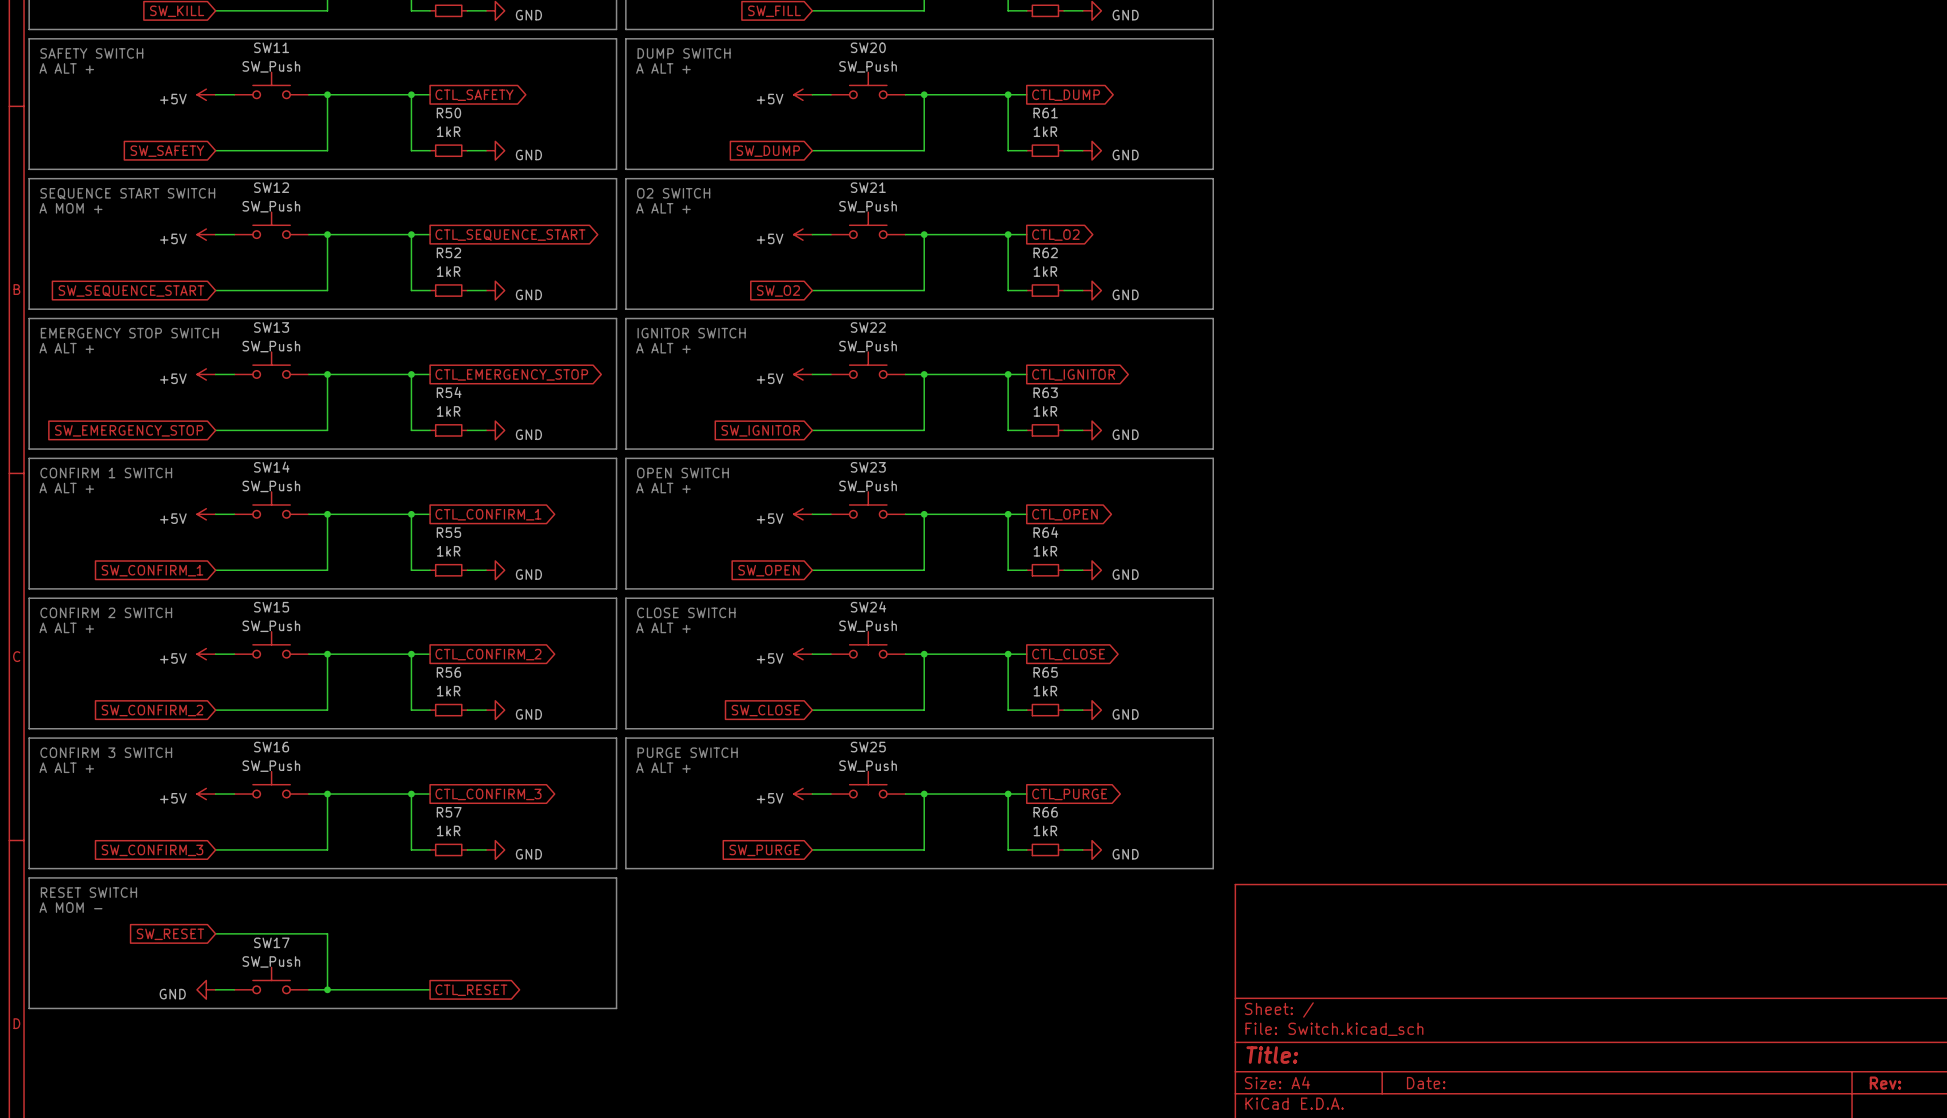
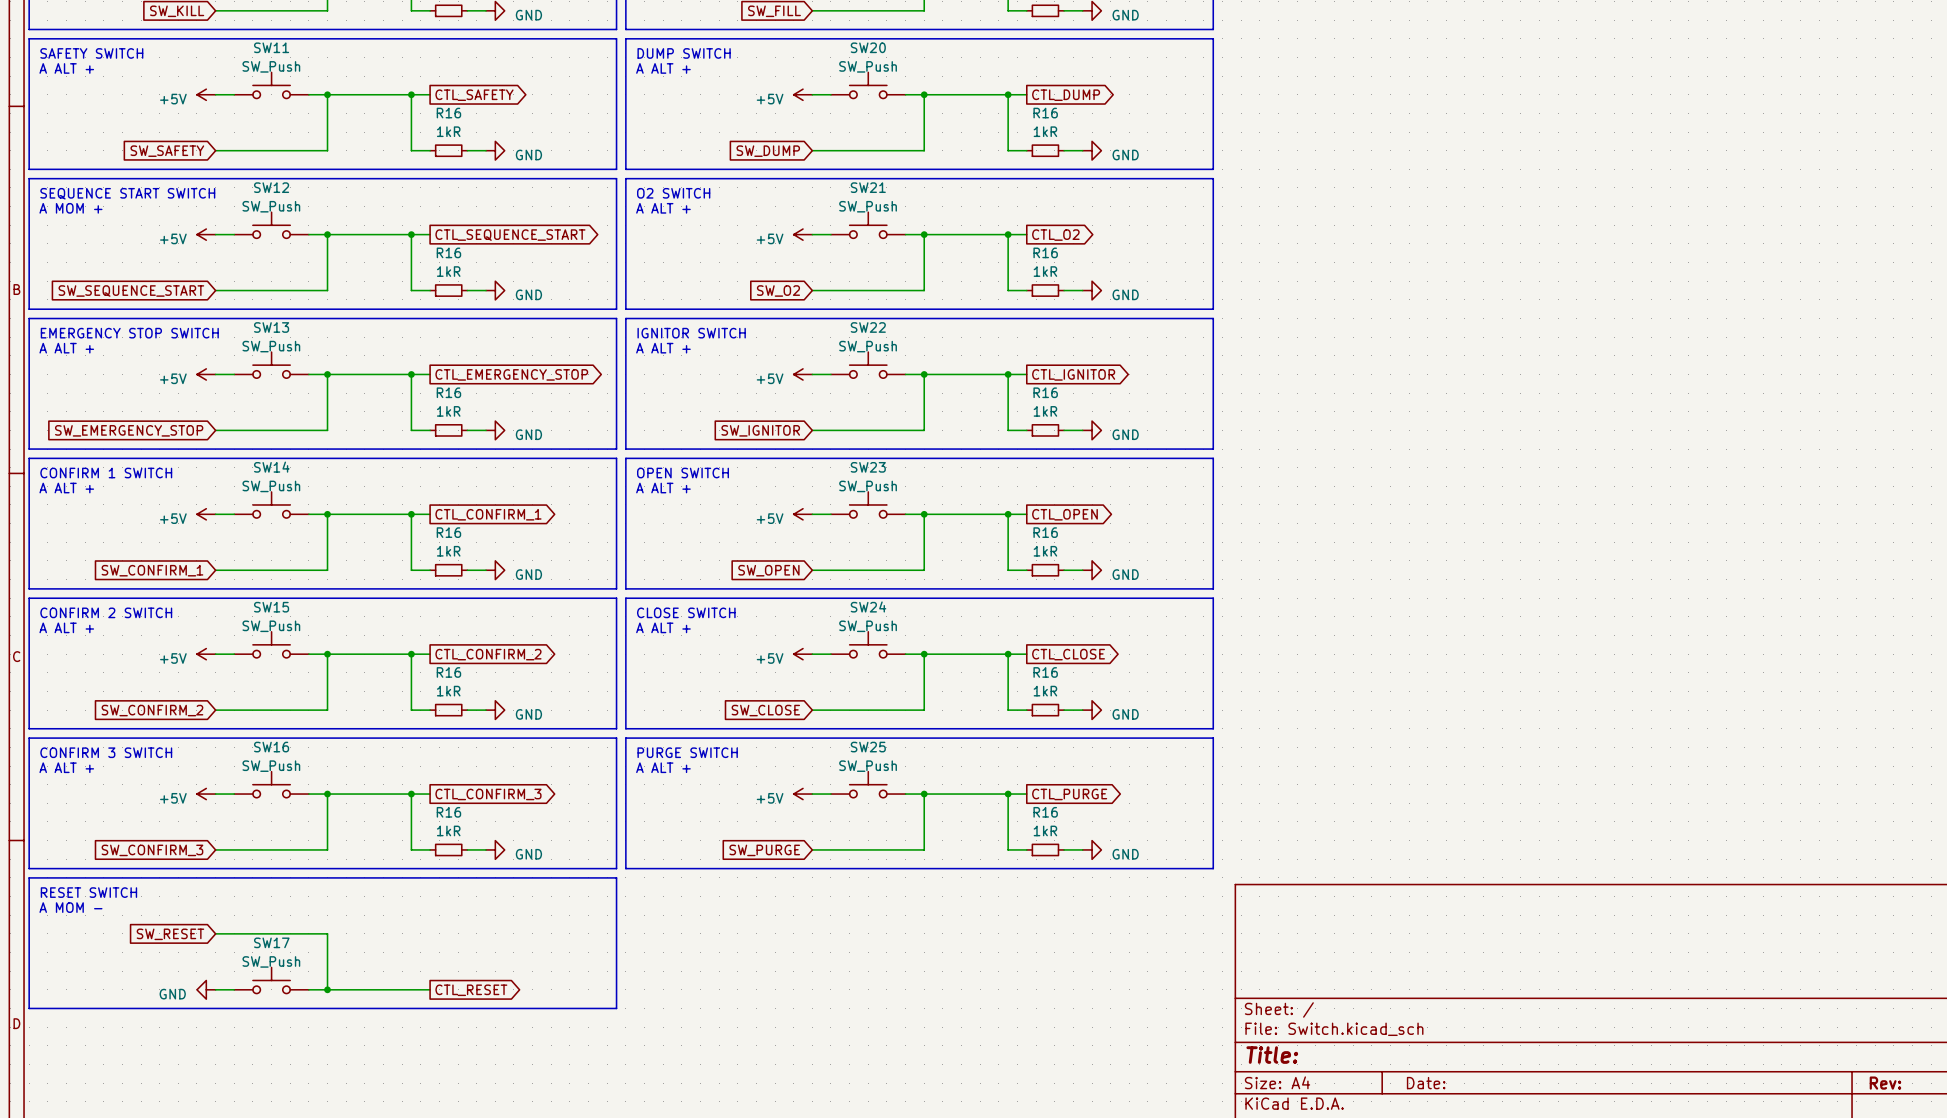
R50 name: R50 (448, 113) -> R16 (448, 113)
R61 name: R61 (1045, 113) -> R16 (1045, 113)
R52 name: R52 (448, 252) -> R16 (448, 252)
R62 name: R62 (1045, 252) -> R16 (1045, 252)
R54 name: R54 (449, 392) -> R16 (448, 392)
R63 name: R63 (1045, 392) -> R16 (1045, 392)
R55 name: R55 (448, 532) -> R16 (448, 532)
R64 name: R64 (1045, 532) -> R16 (1045, 532)
R56 name: R56 (448, 672) -> R16 (448, 672)
R65 name: R65 (1045, 672) -> R16 (1045, 672)
R57 name: R57 (449, 812) -> R16 (448, 812)
R66 name: R66 (1045, 812) -> R16 (1045, 812)

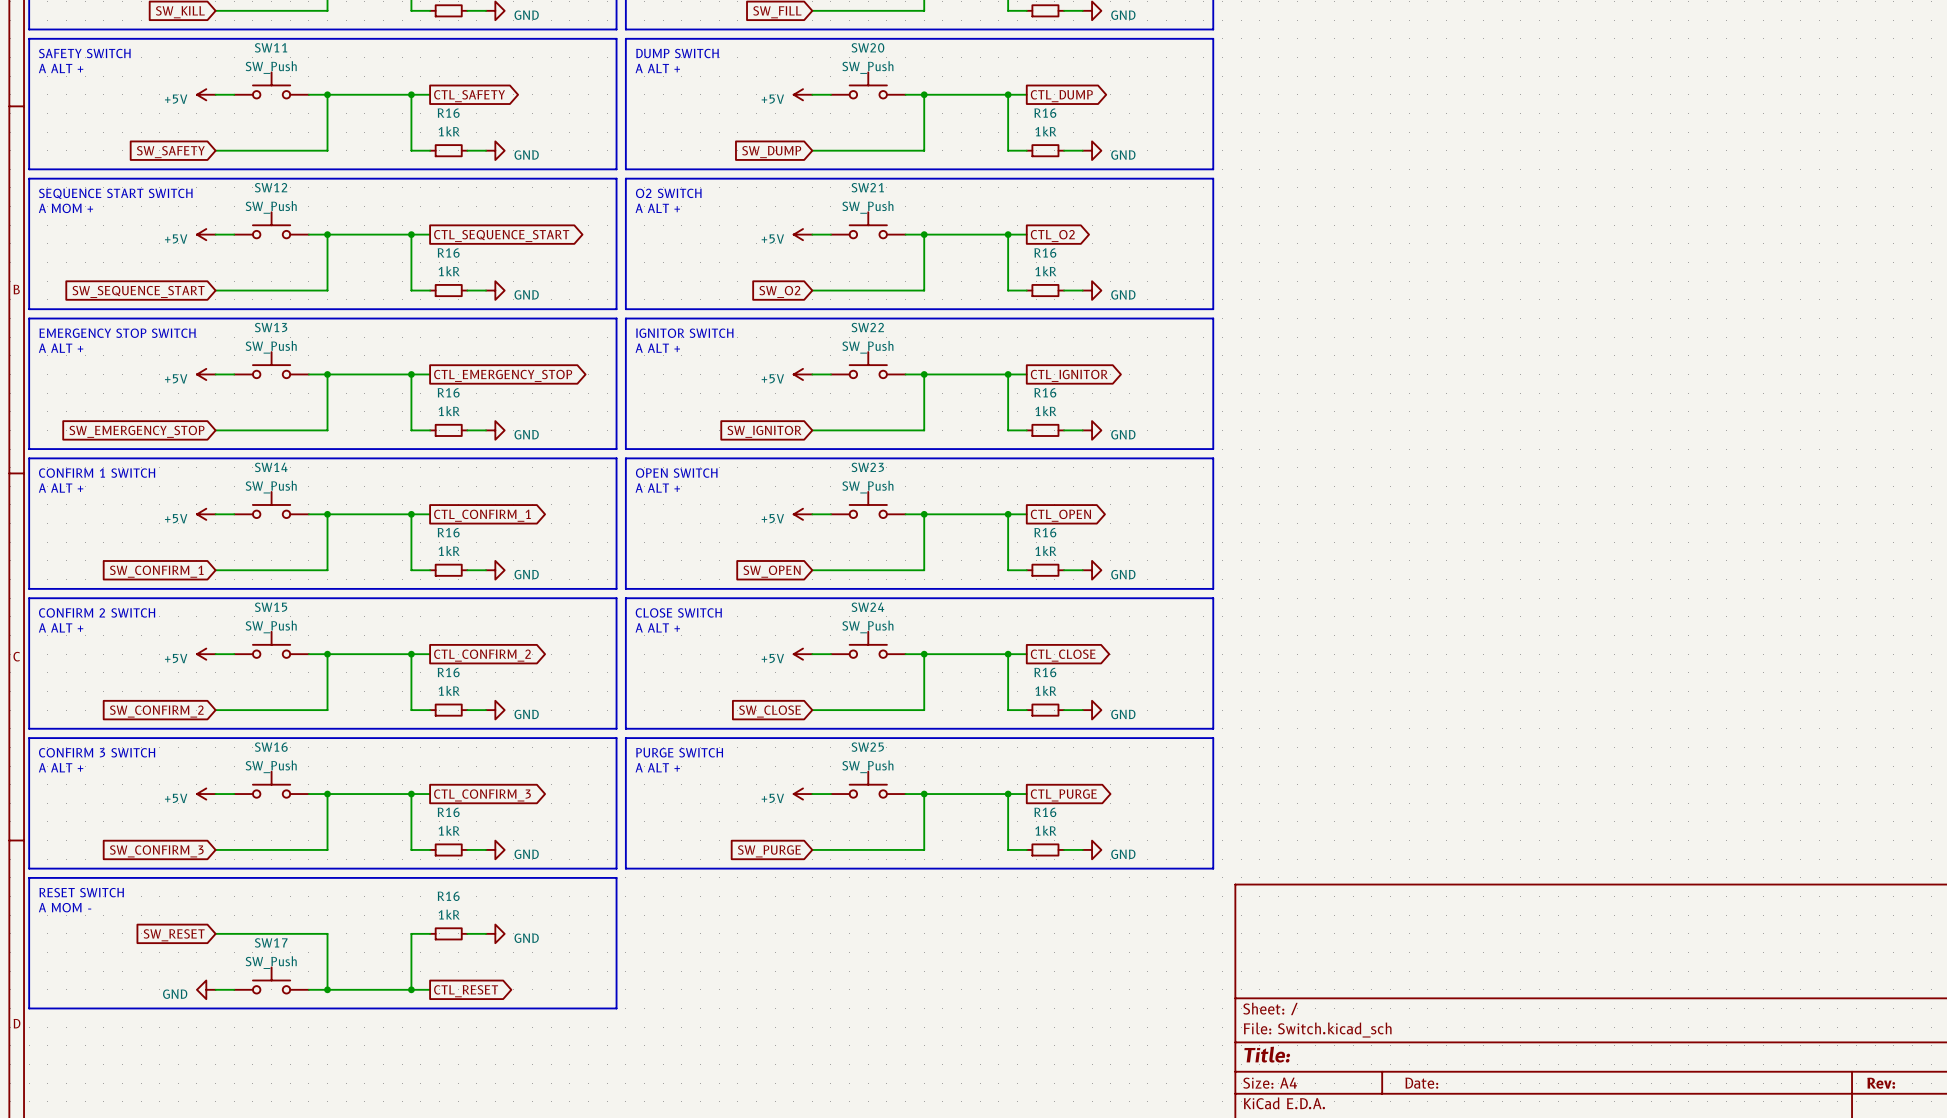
wire: none -> (430, 933) (411, 933) (411, 989)
R16: none -> 1kR (448, 933)
wire: none -> (467, 933) (486, 933)
power symbol: none -> GND (495, 933)
junction: none -> (411, 989)

